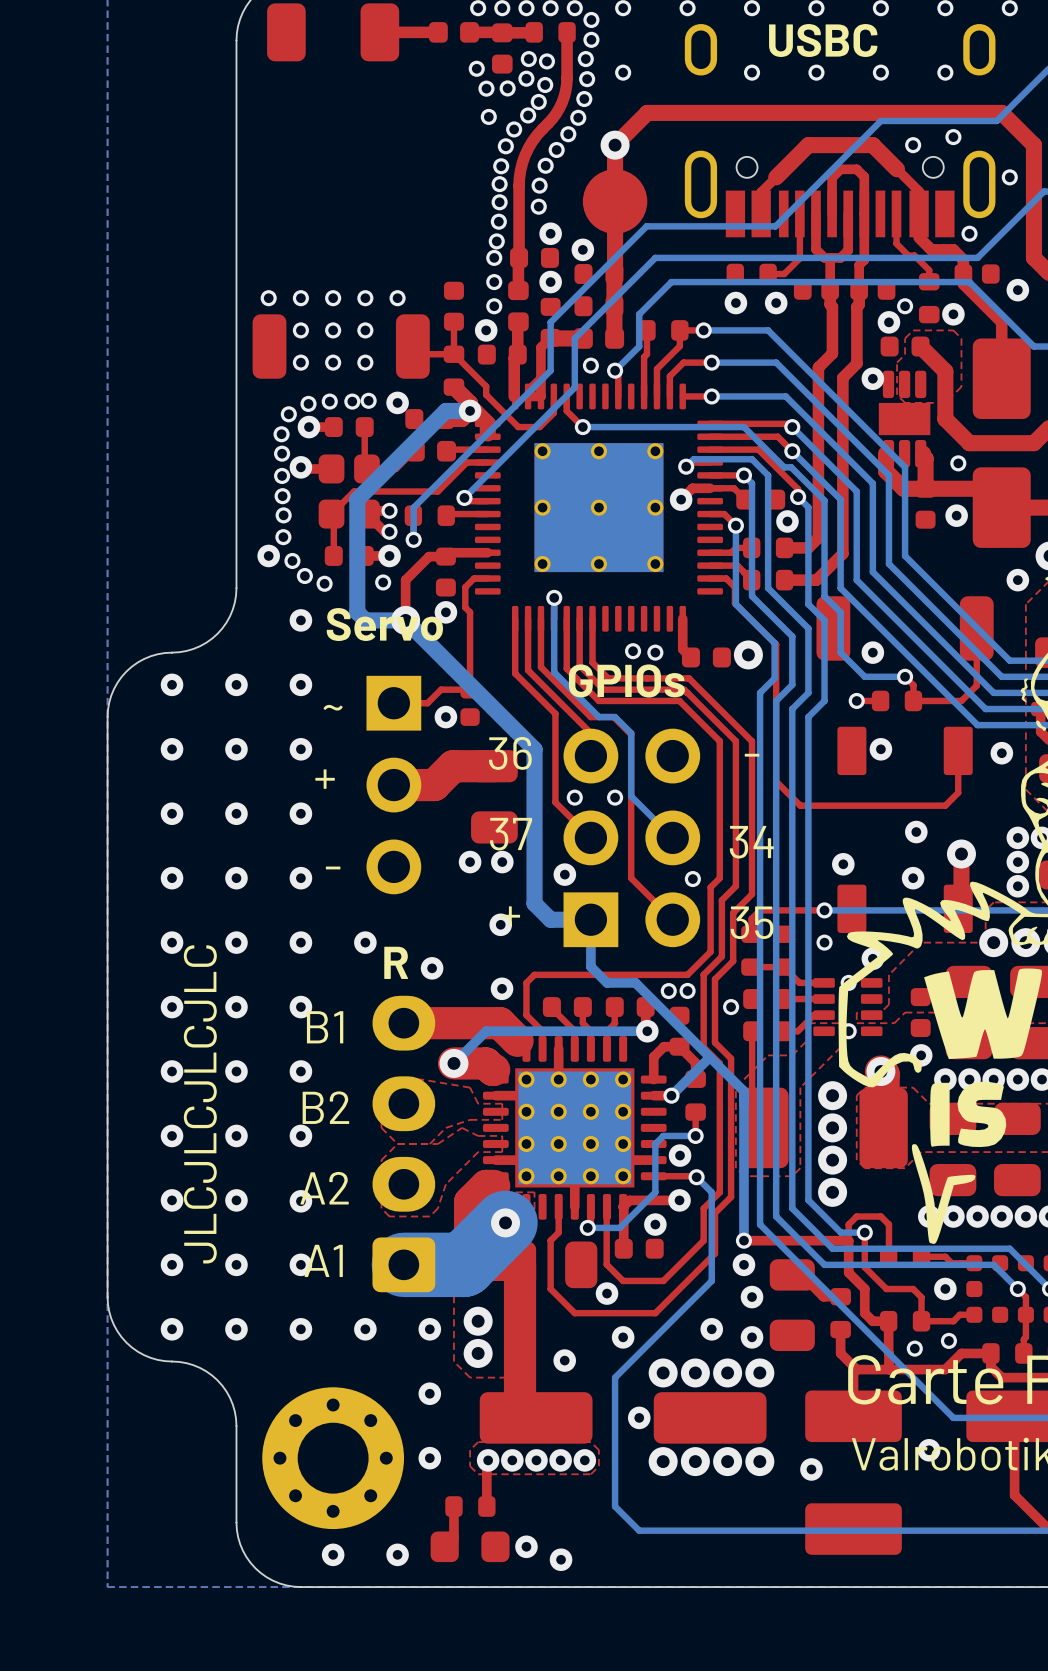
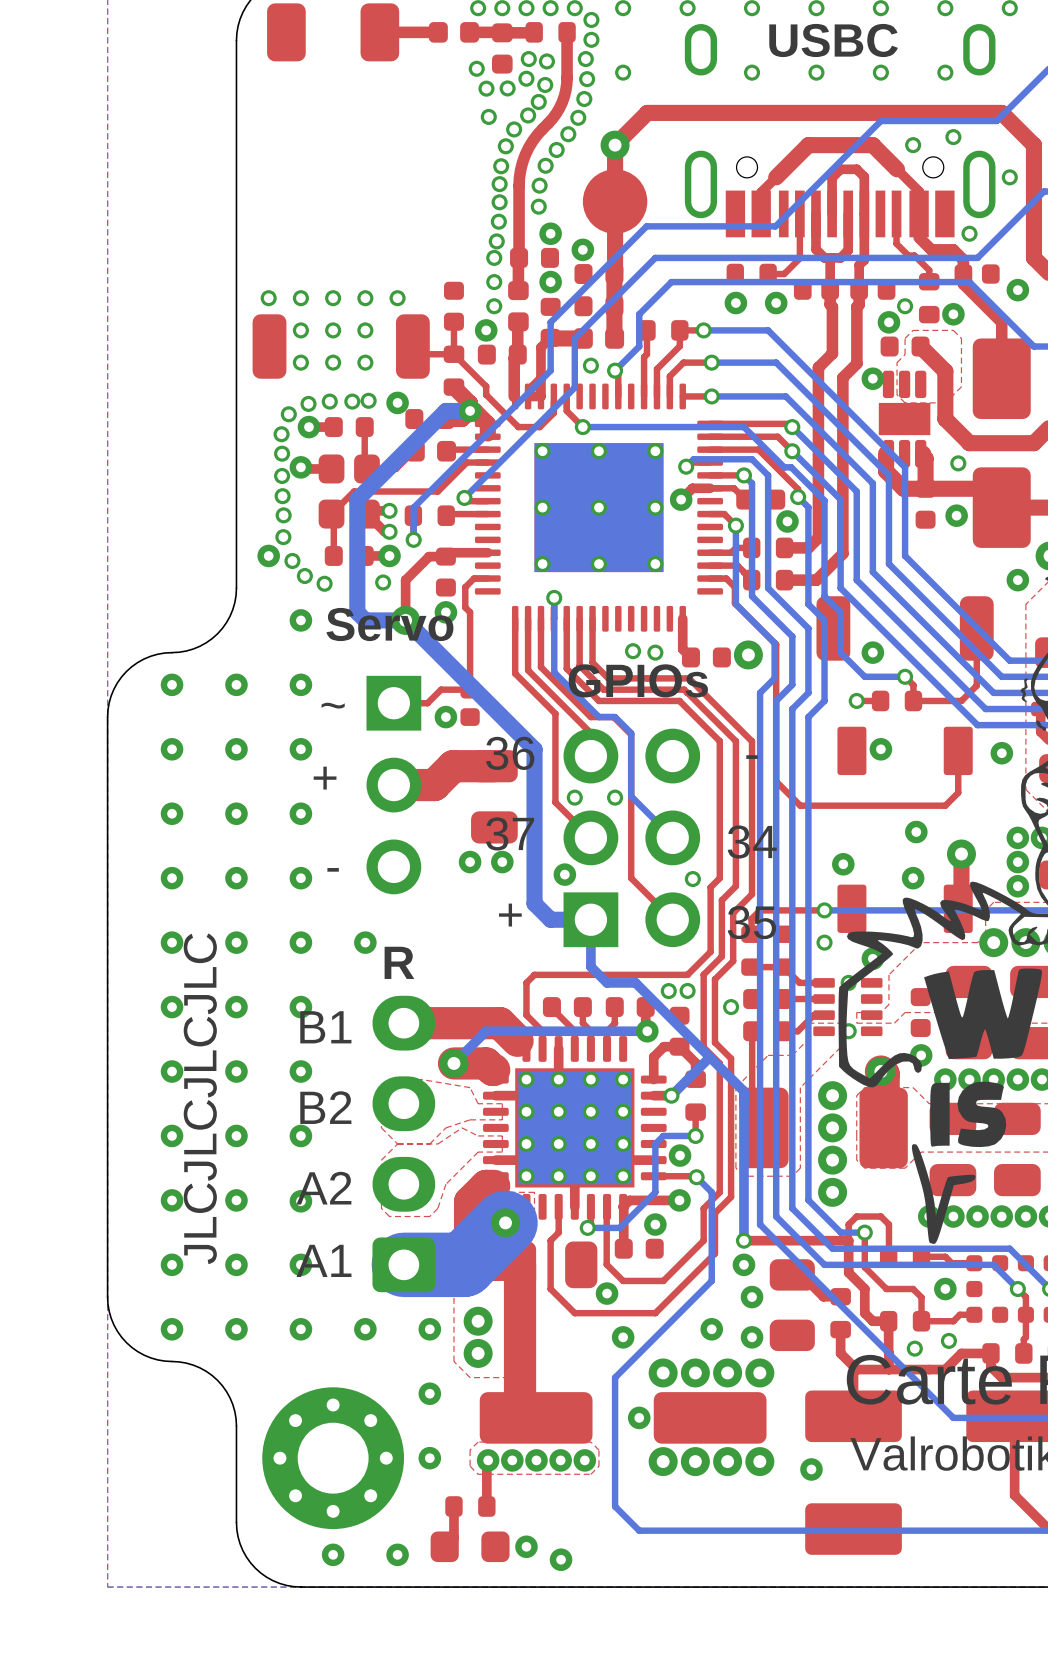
via: (500, 924) -> none
via: (432, 968) -> none
via: (502, 988) -> none
via: (564, 1360) -> none
via: (929, 1450) -> none

